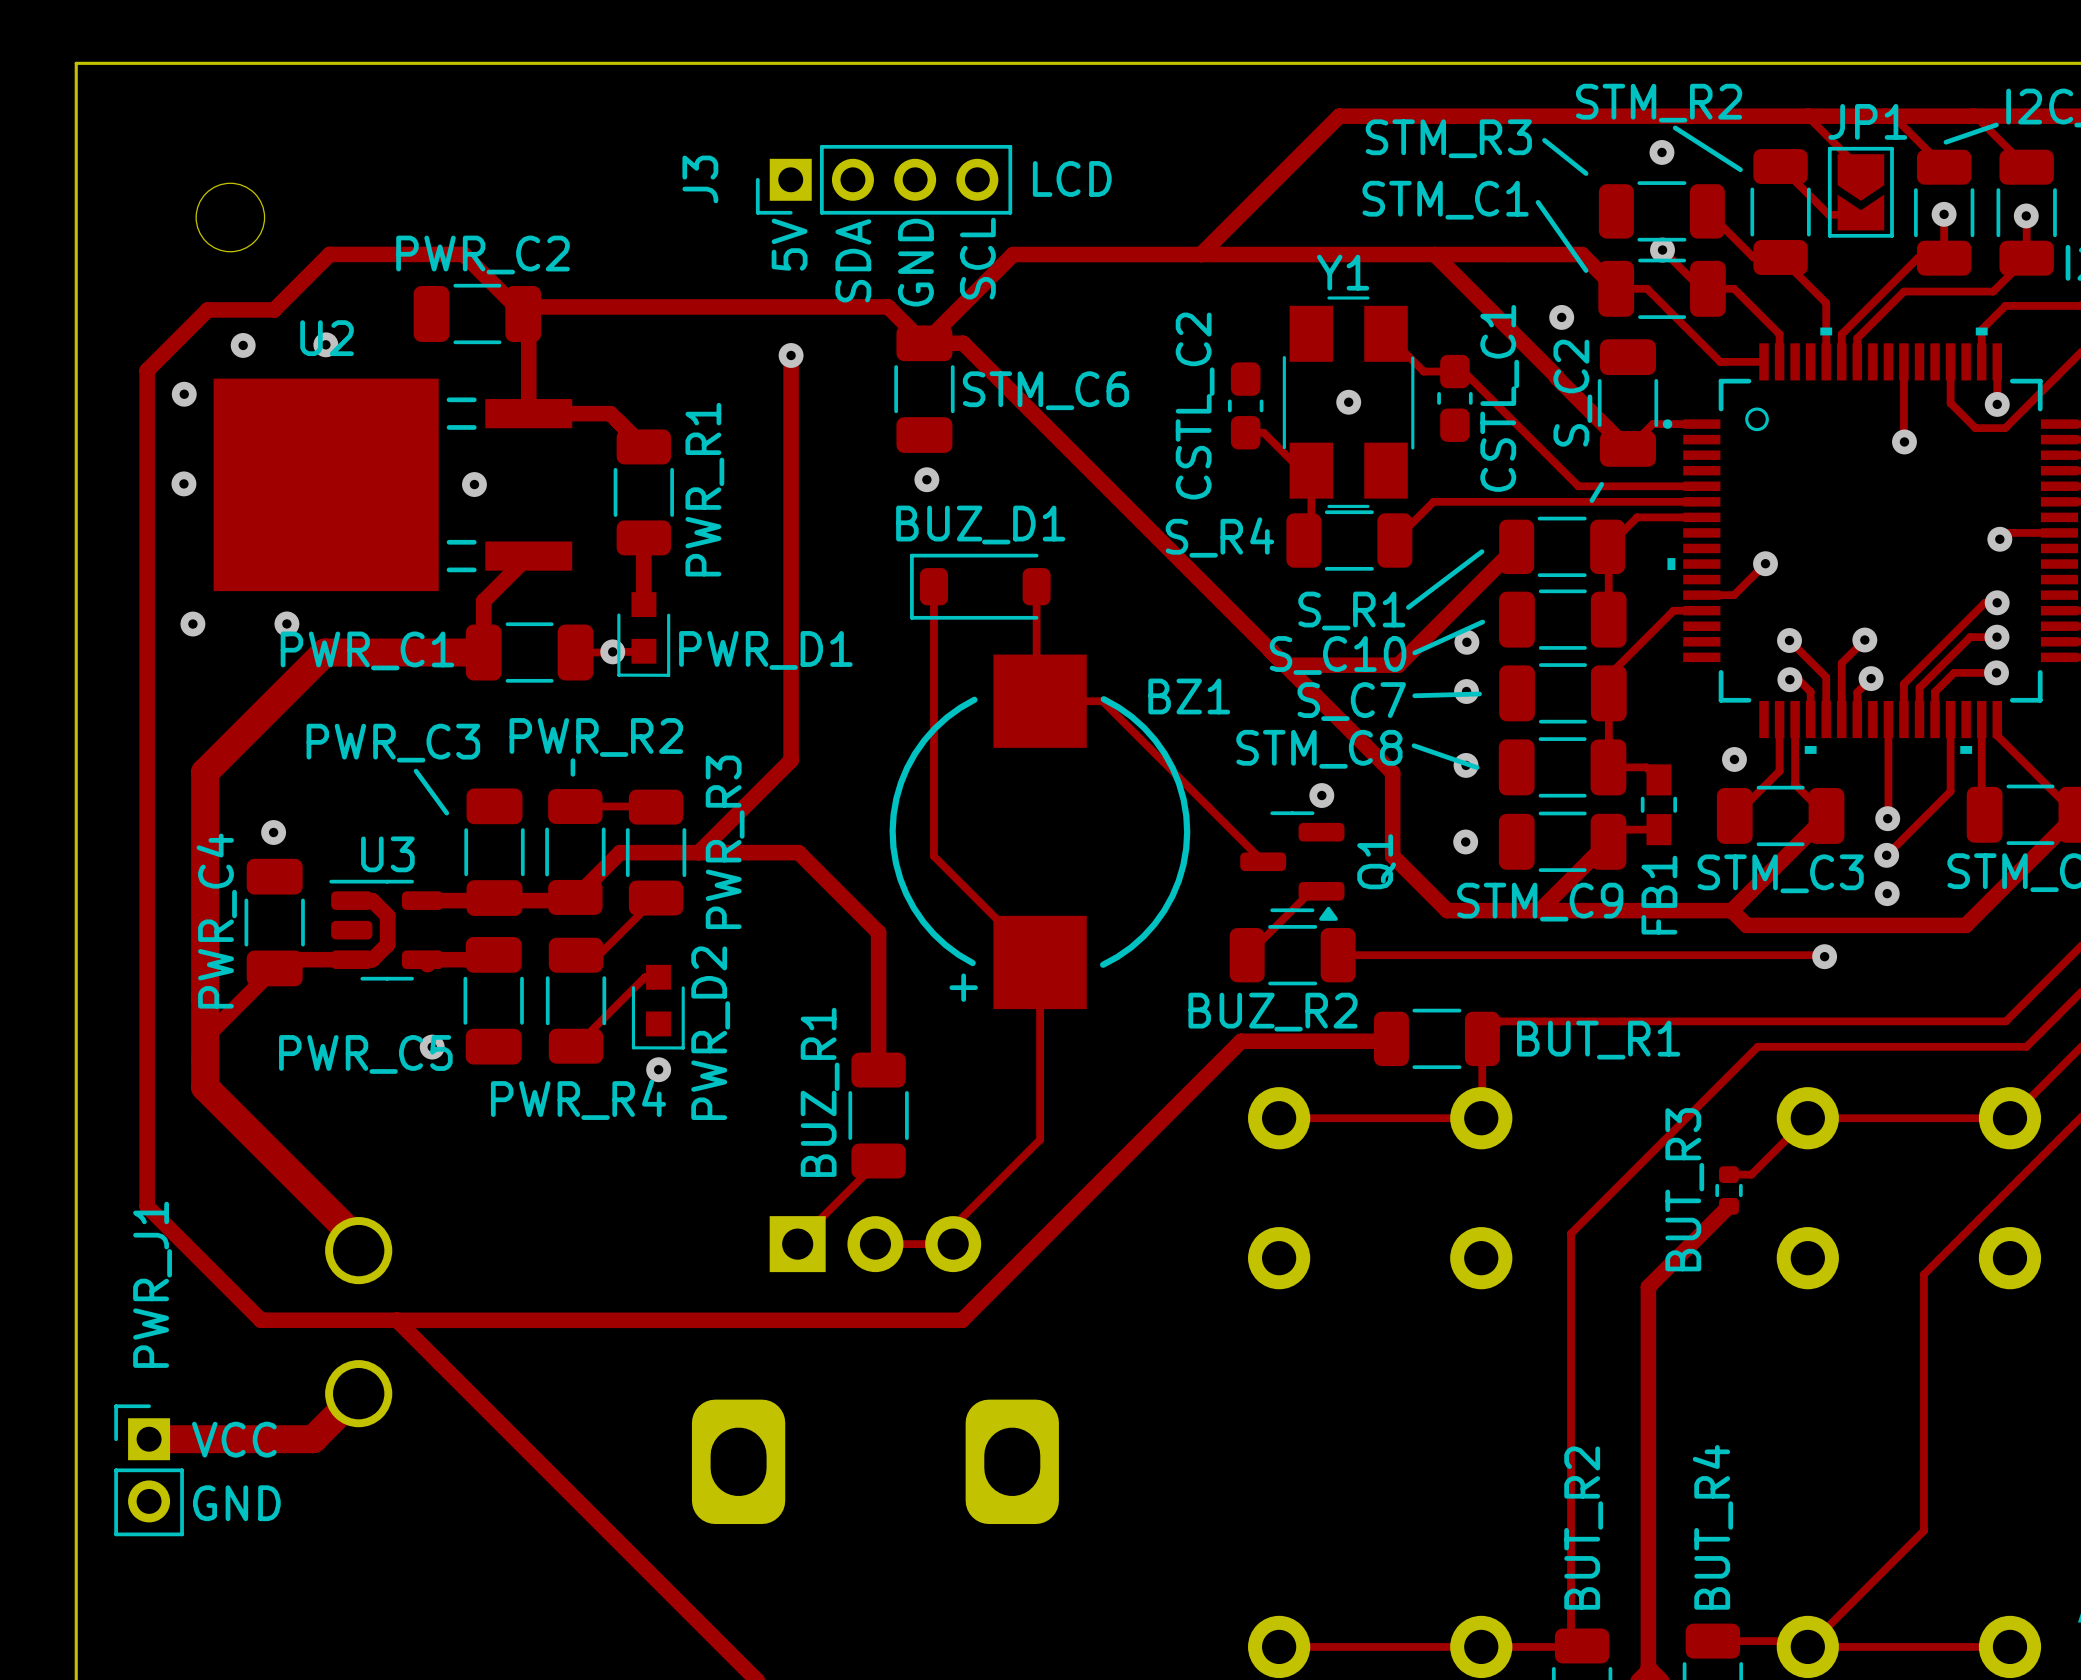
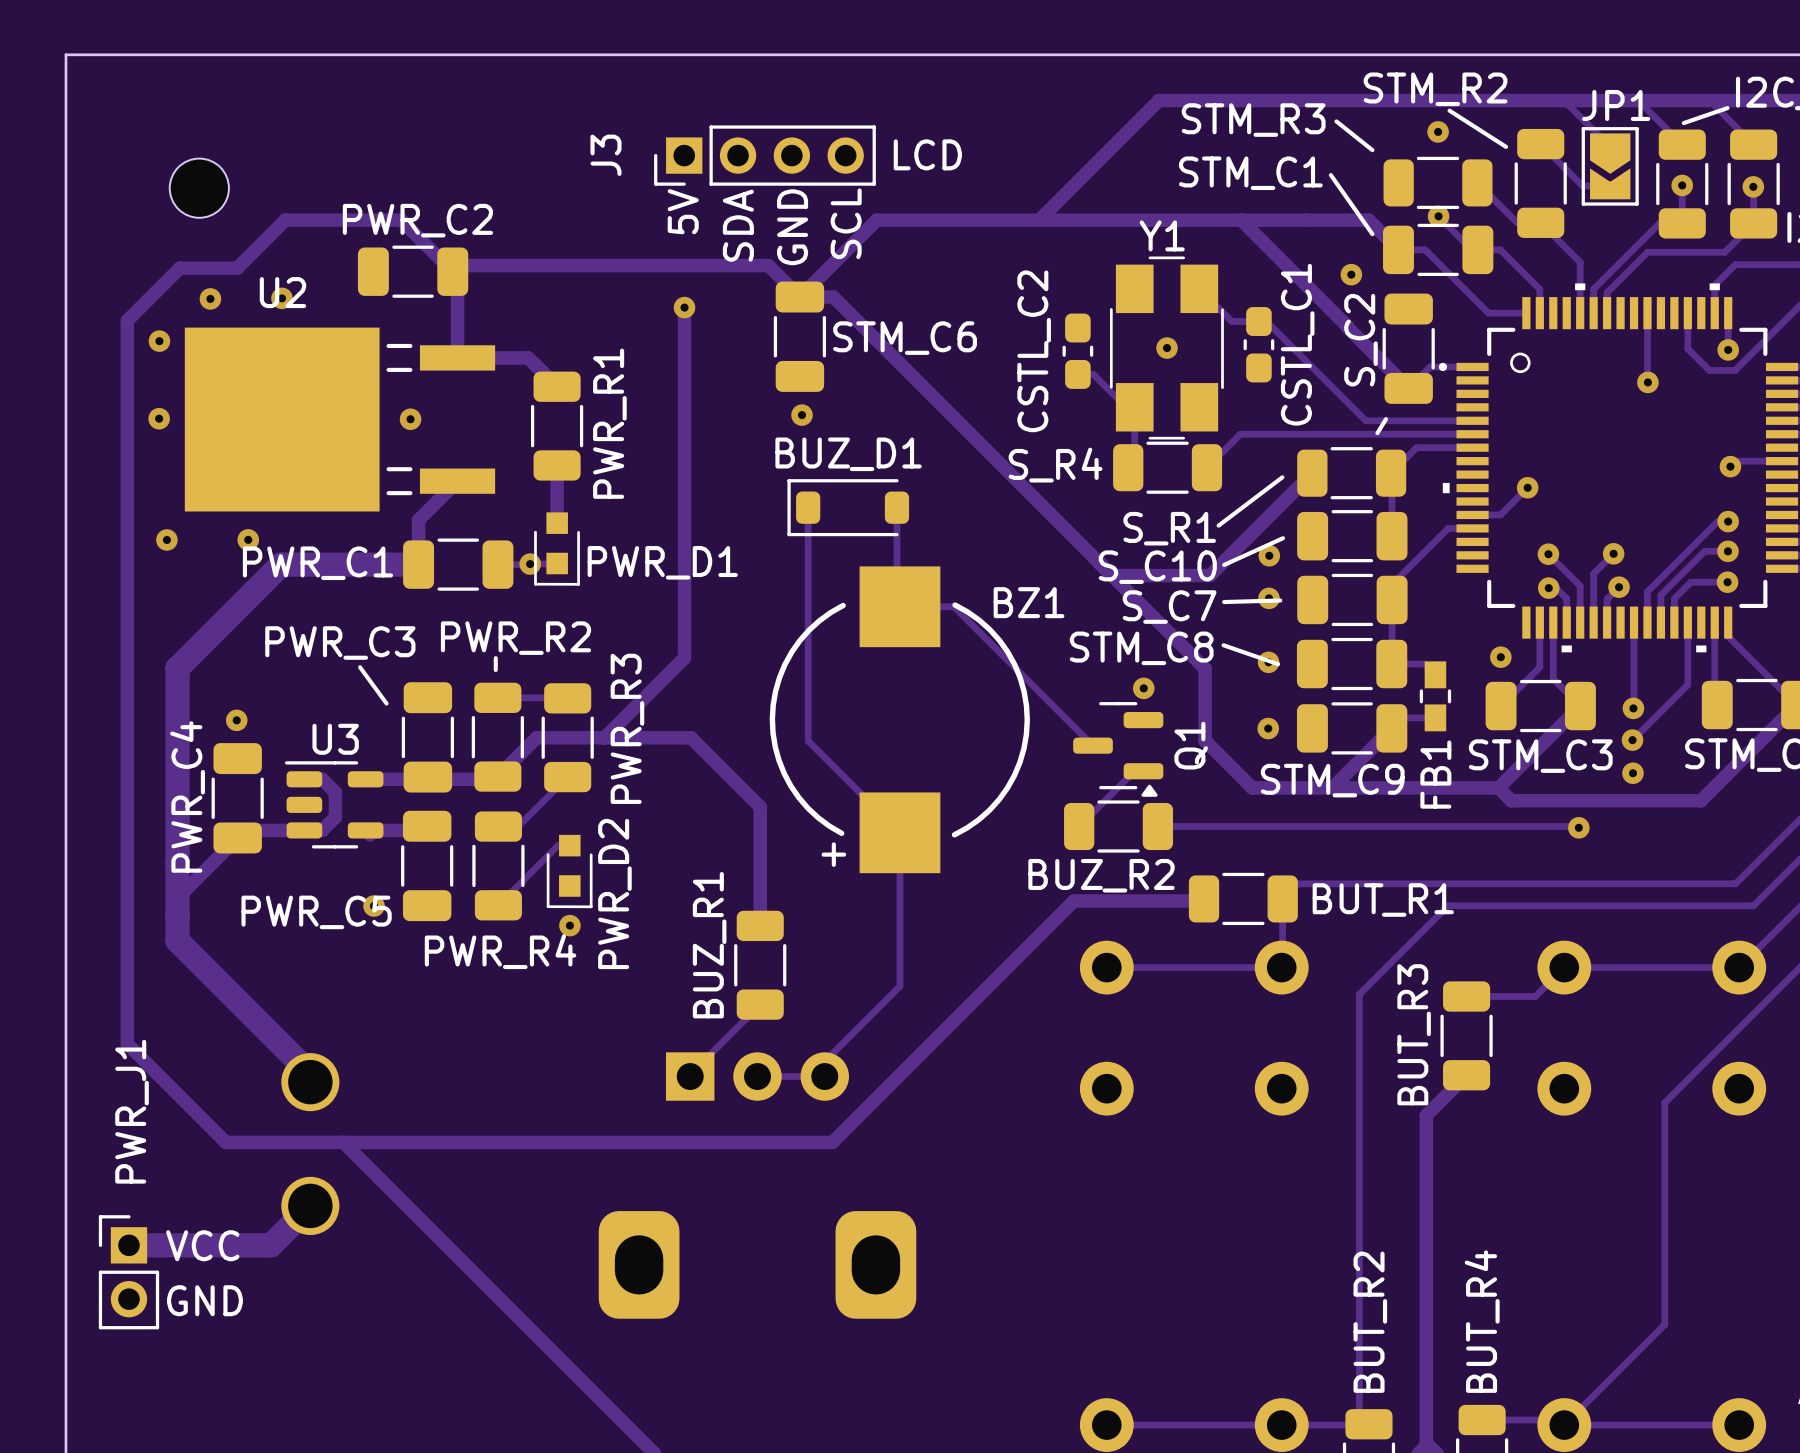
track: (1757, 1046) (1571, 1233) -> (1520, 905) (1448, 905) (1359, 994) (1359, 1067)
track: (1774, 1151) (1751, 1174) (1729, 1174) -> (1535, 996) (1466, 996)
BUT_R3 footprint: [1715, 1166, 1743, 1215] -> [1440, 981, 1493, 1091]
track: (1729, 1206) (1648, 1289) -> (1466, 1075) (1426, 1115)

